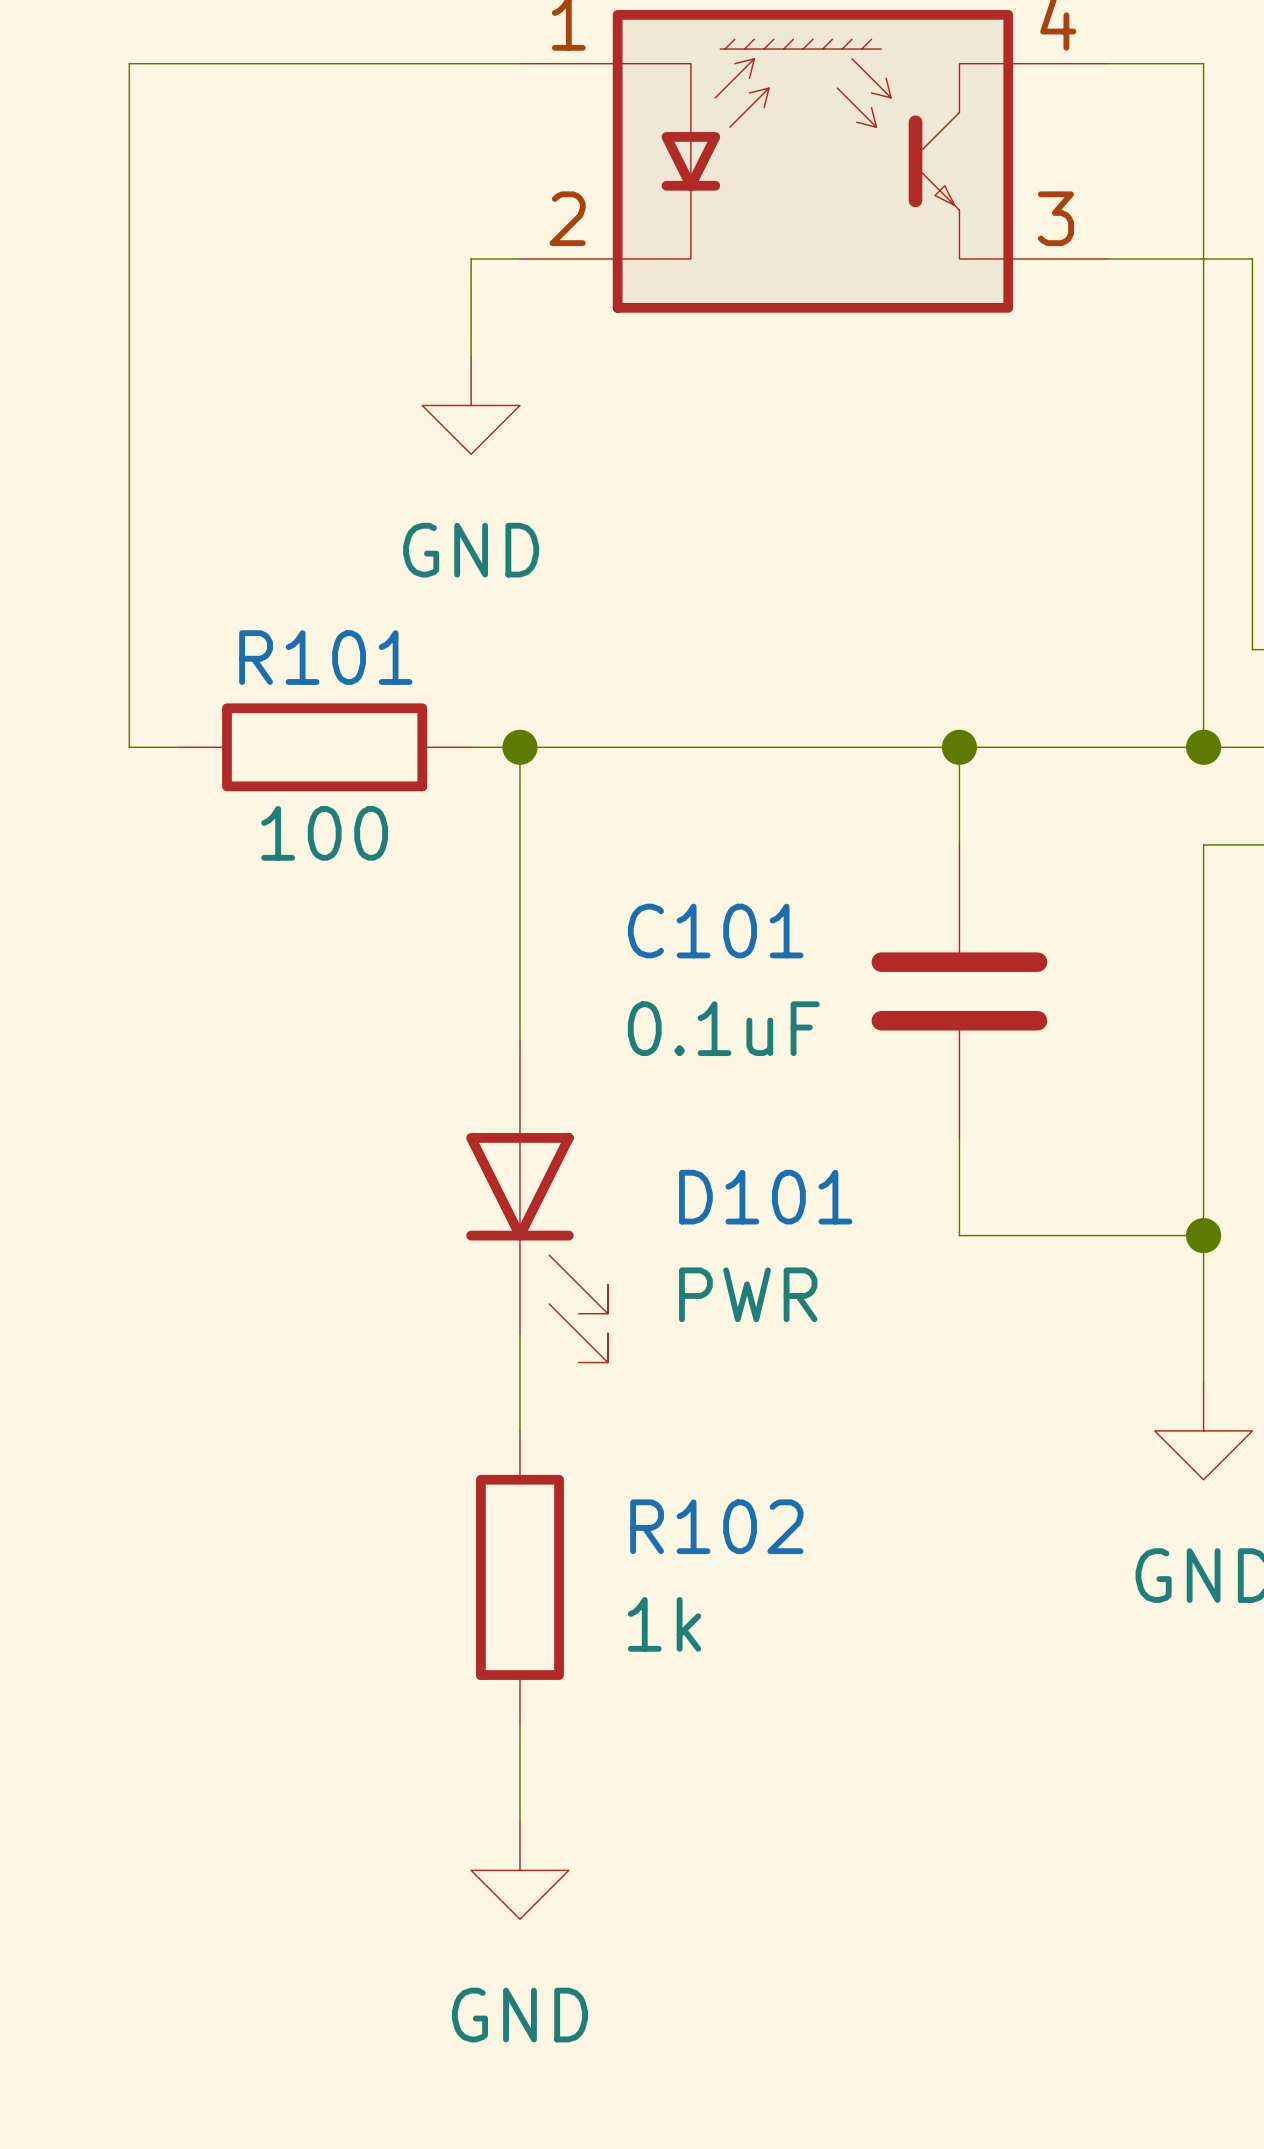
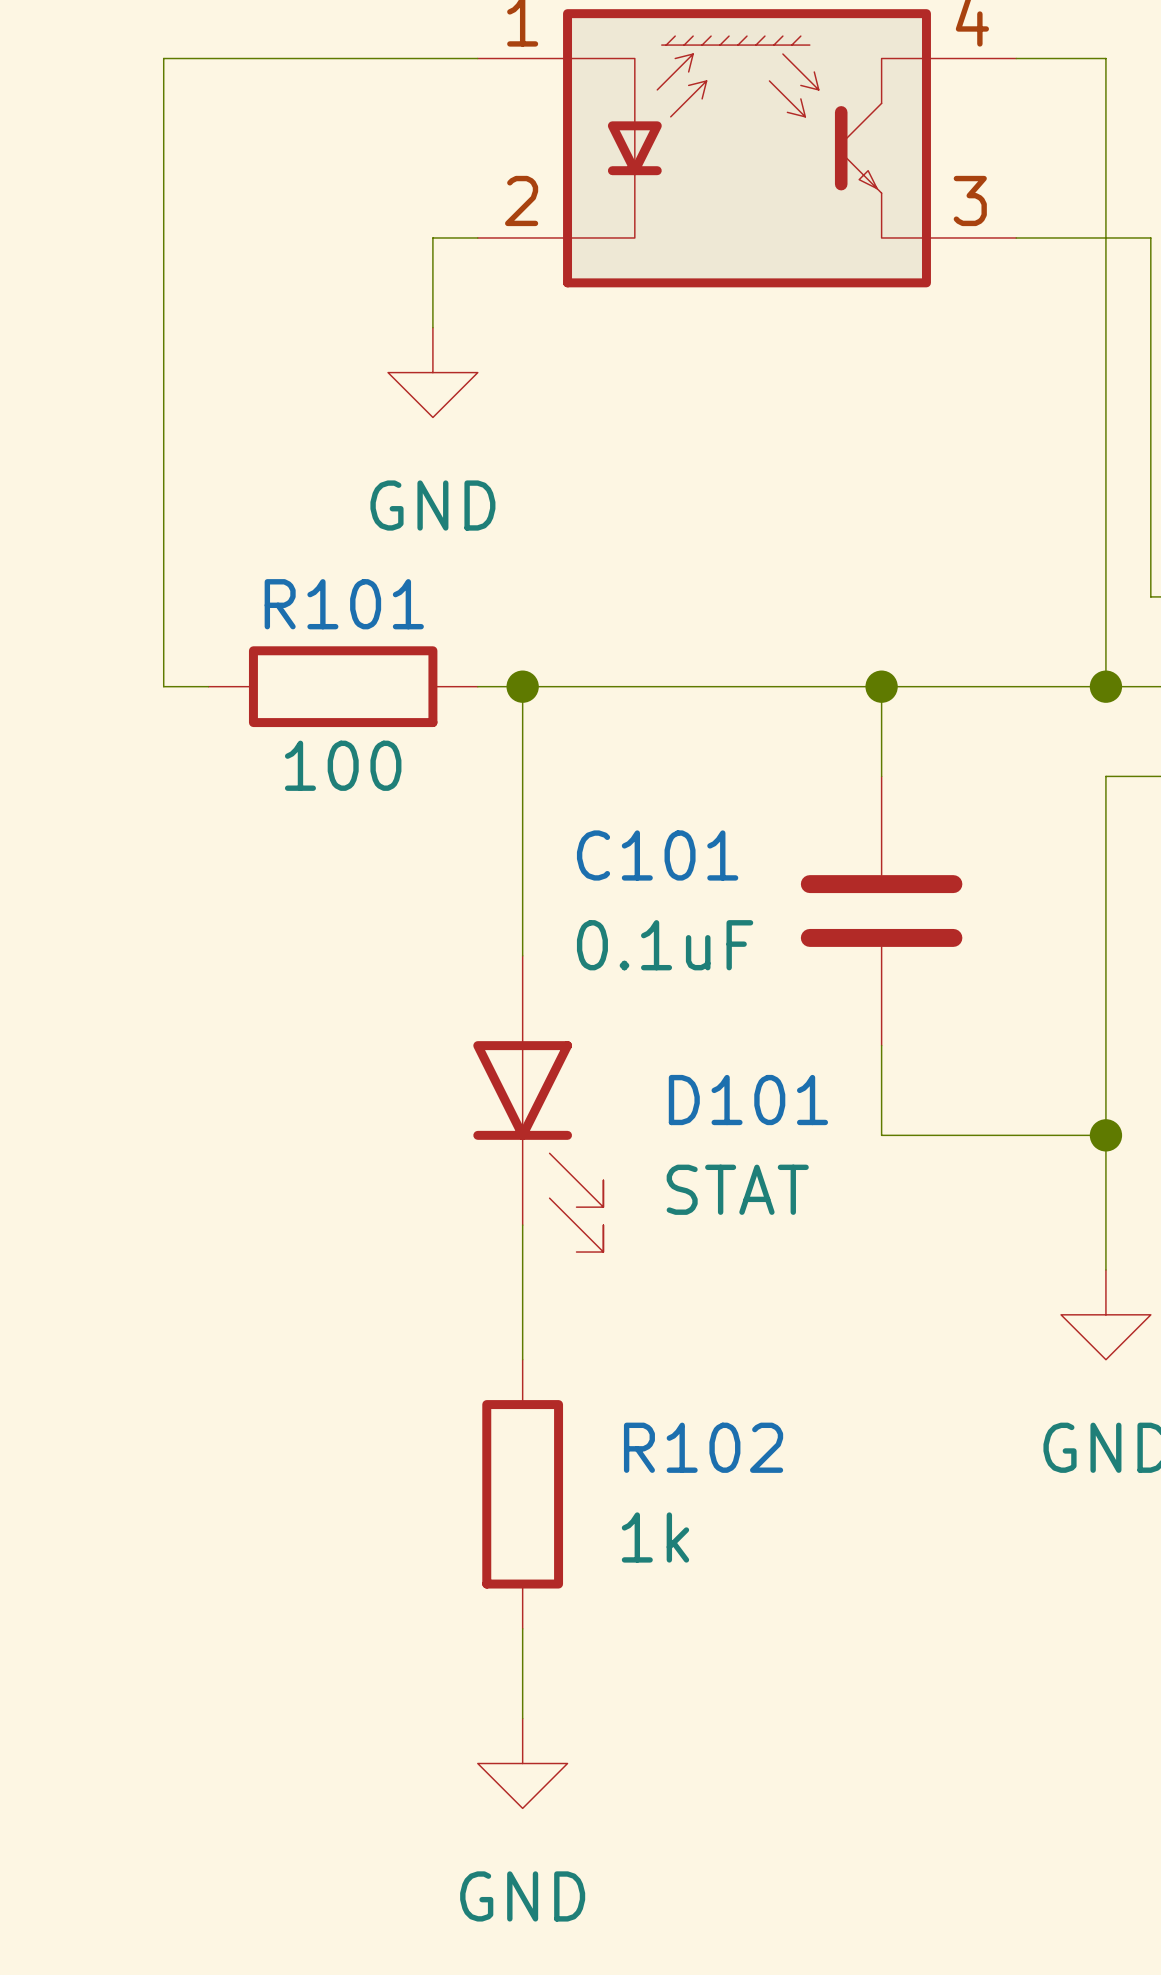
wire: (178, 63) (129, 63) (129, 747) (178, 747) -> (163, 58) (163, 686) (208, 686)
R101 position: (324, 747) -> (343, 686)
wire: (471, 747) (519, 747) (519, 1040) -> none
junction position: (519, 747) -> (522, 686)
wire: none -> (522, 686) (522, 955)
D101 position: (537, 1201) -> (538, 1103)
D101 value: PWR (748, 1294) -> STAT (737, 1189)
wire: (519, 1333) (519, 1430) -> none
wire: none -> (522, 1225) (522, 1359)
R102 position: (519, 1577) -> (522, 1494)
wire: (519, 1723) (519, 1821) -> (522, 1628) (522, 1718)
power symbol position: GND (519, 1870) -> GND (522, 1763)

